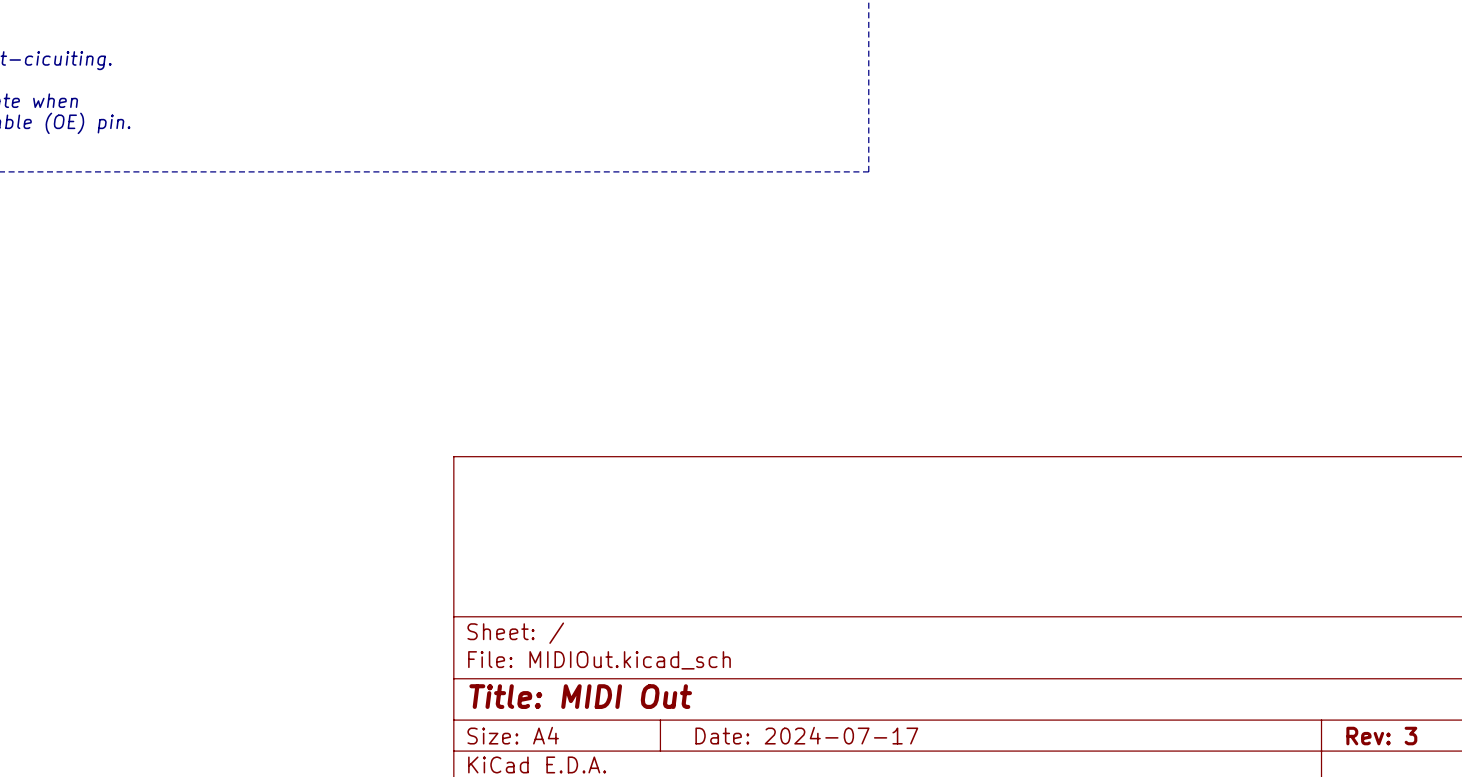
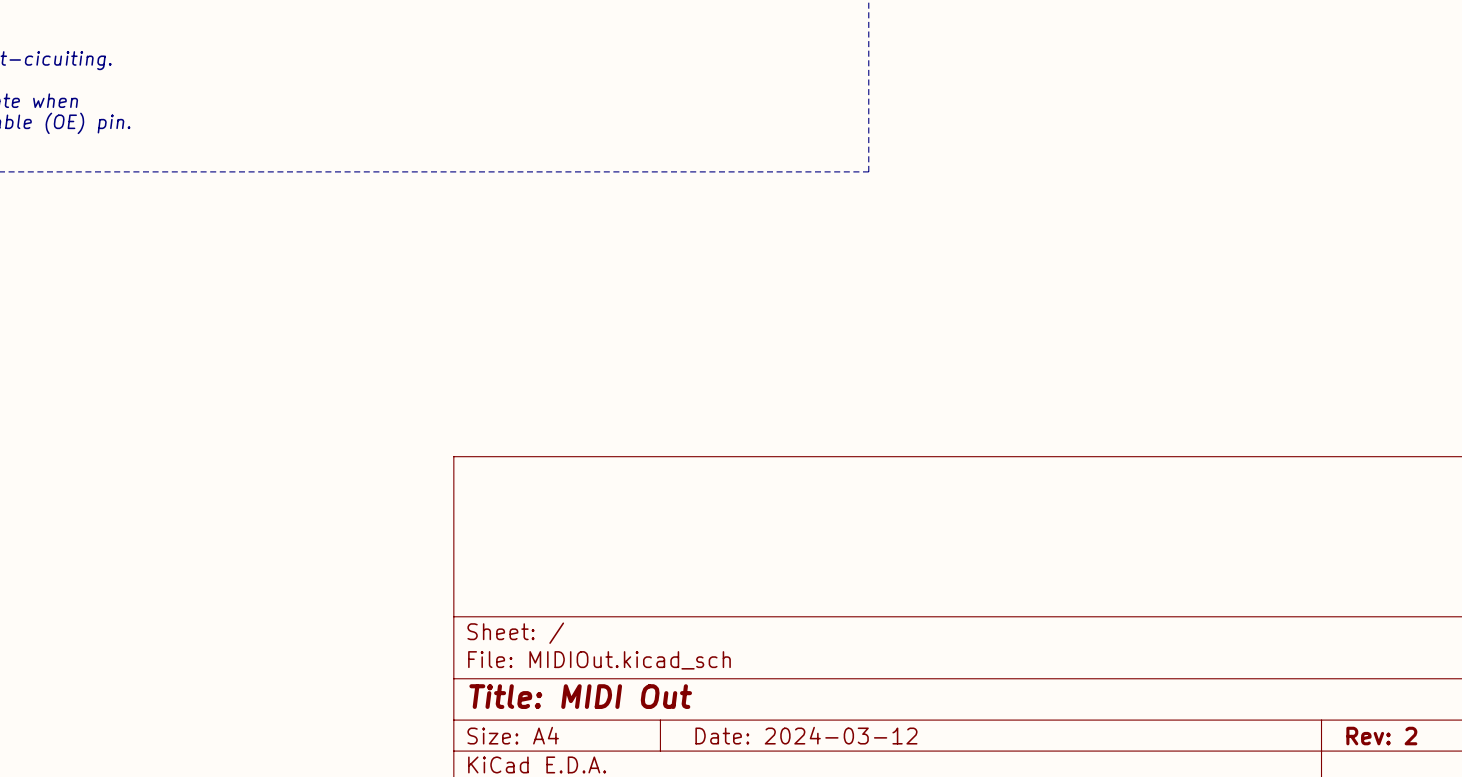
title block: Date: 2024-07-17 (806, 735) -> Date: 2024-03-12 (806, 735)
title block: Rev: 3 (1381, 736) -> Rev: 2 (1381, 736)

